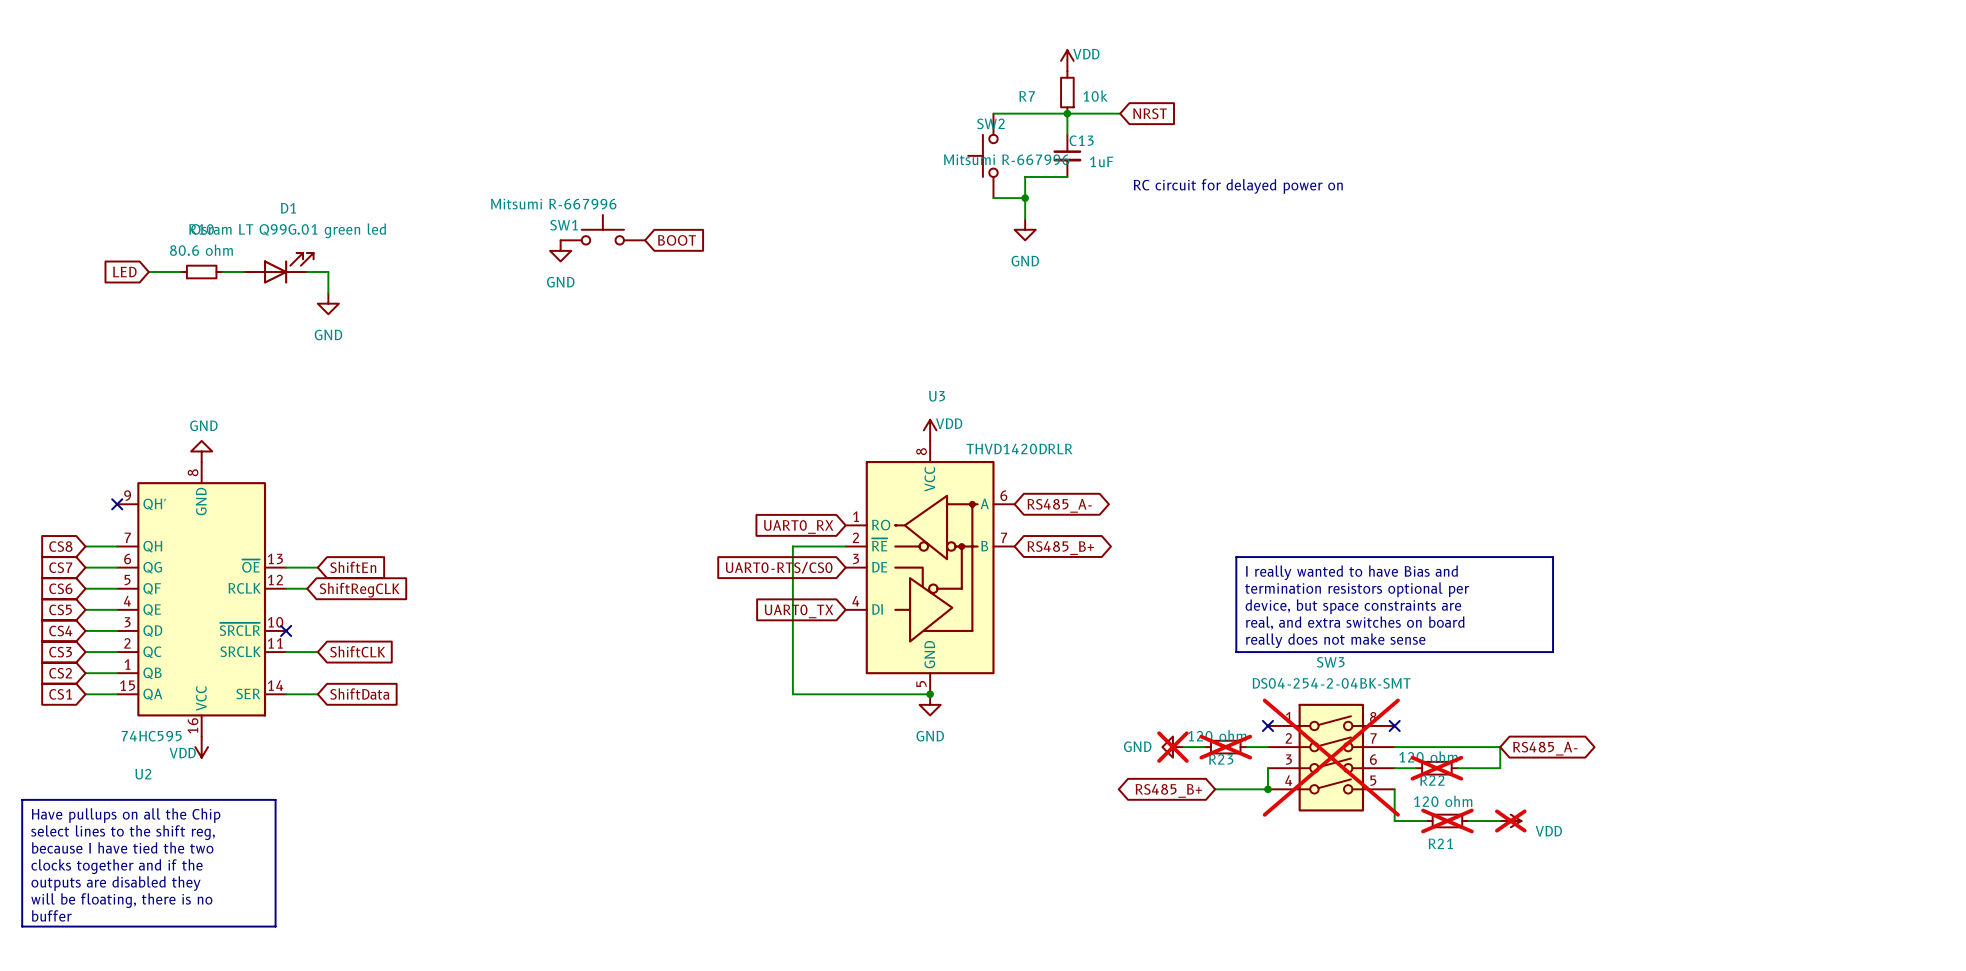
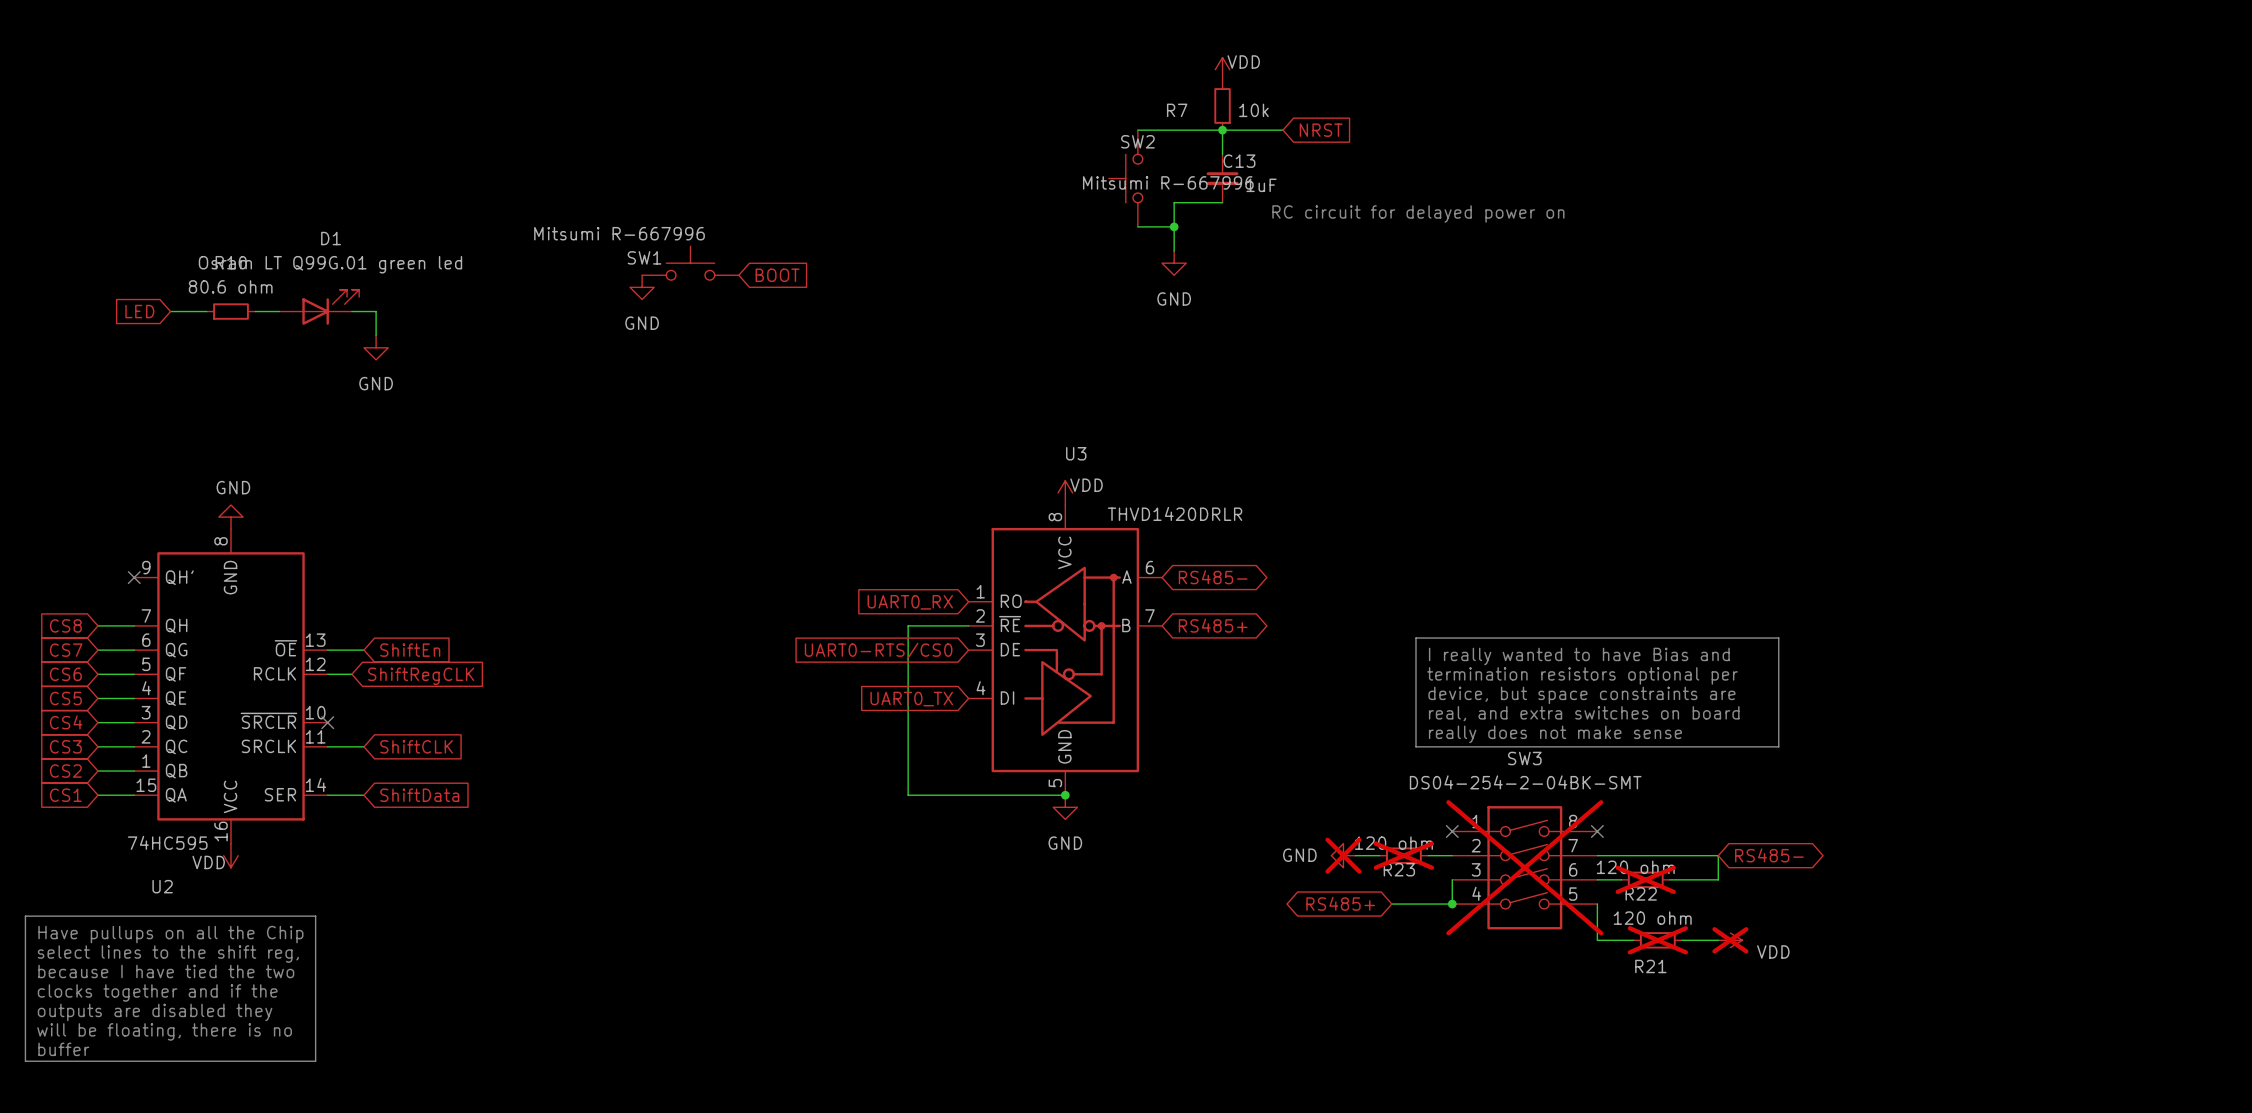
global label: RS485_A- (1059, 505) -> RS485- (1213, 577)
global label: RS485_B+ (1060, 548) -> RS485+ (1213, 625)
global label: RS485_A- (1545, 748) -> RS485- (1769, 855)
global label: RS485_B+ (1168, 790) -> RS485+ (1340, 903)

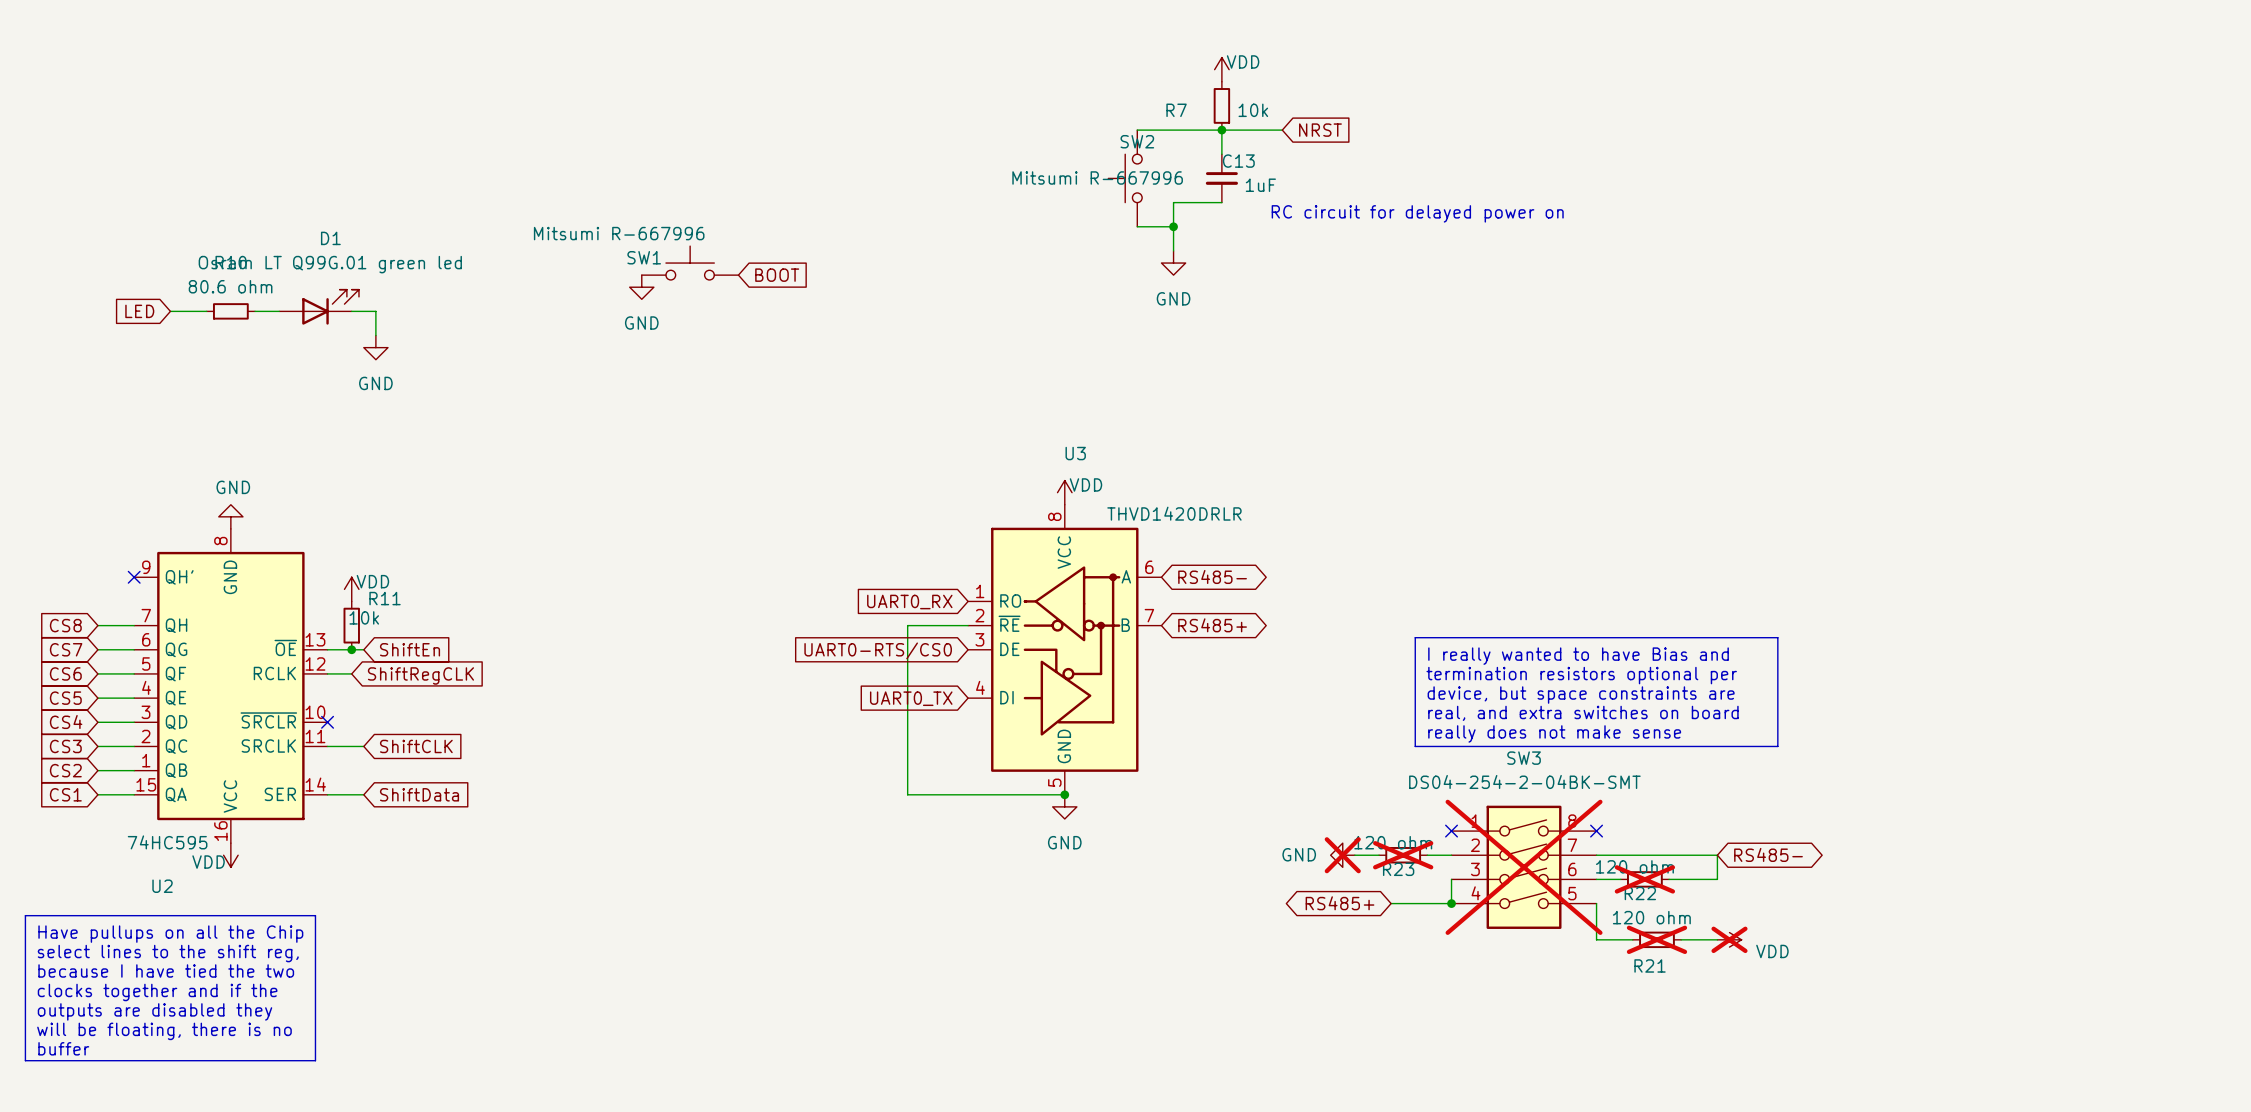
SW2 value position: Mitsumi R-667996 (1168, 182) -> Mitsumi R-667996 (1097, 177)
power symbol: none -> VDD (351, 589)
R11: none -> 10k (351, 625)
junction: none -> (351, 649)

